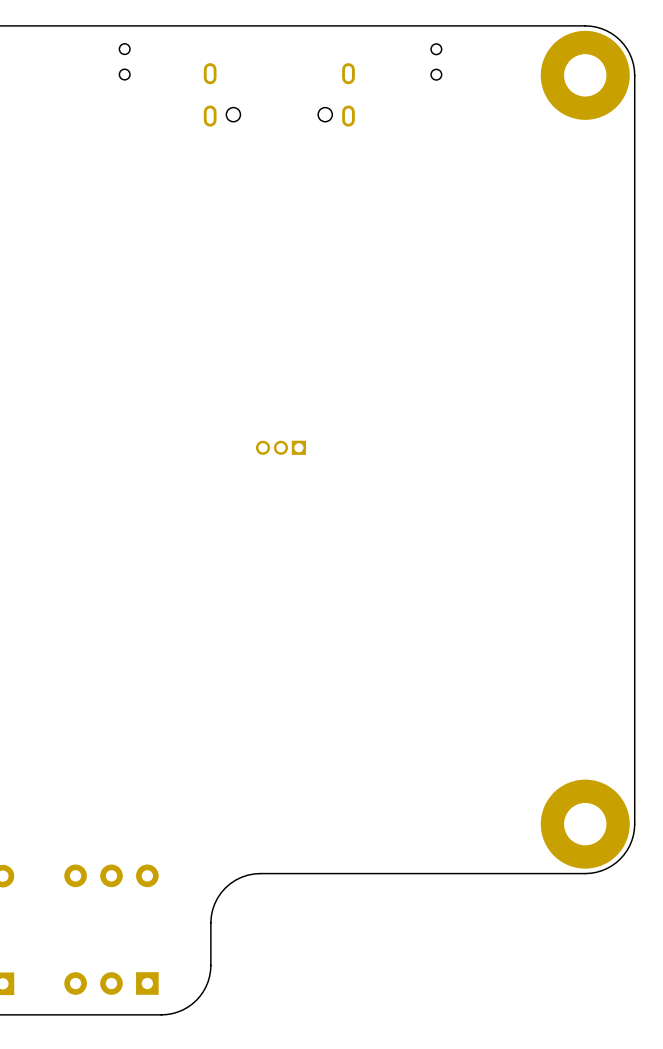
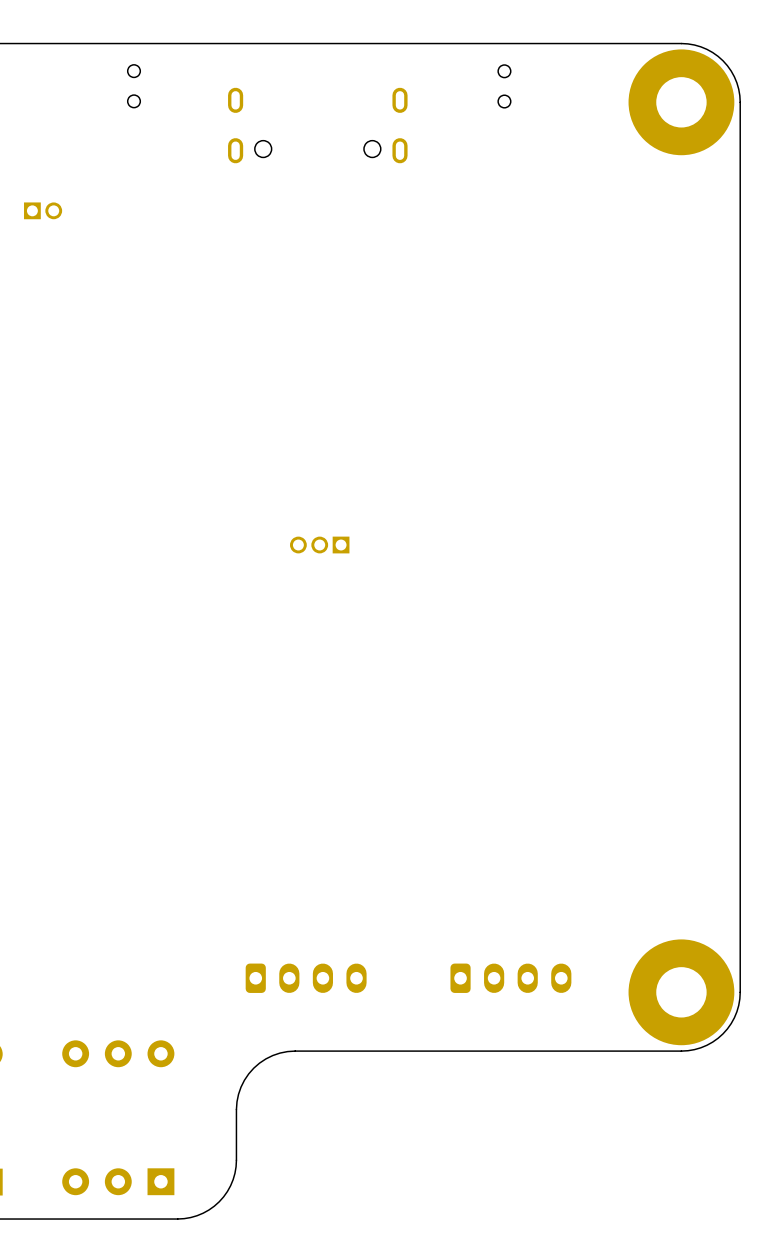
part: none -> (43, 210)
part: none -> (306, 978)
part: none -> (510, 978)

